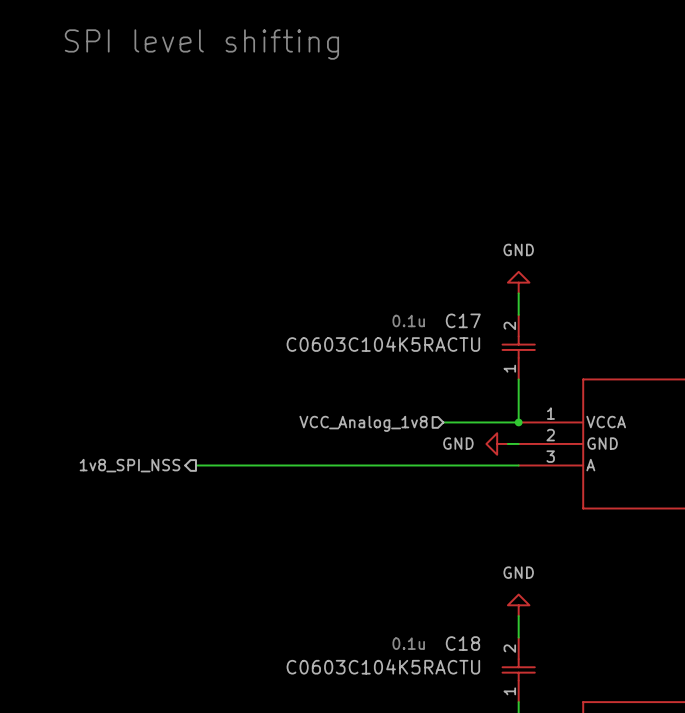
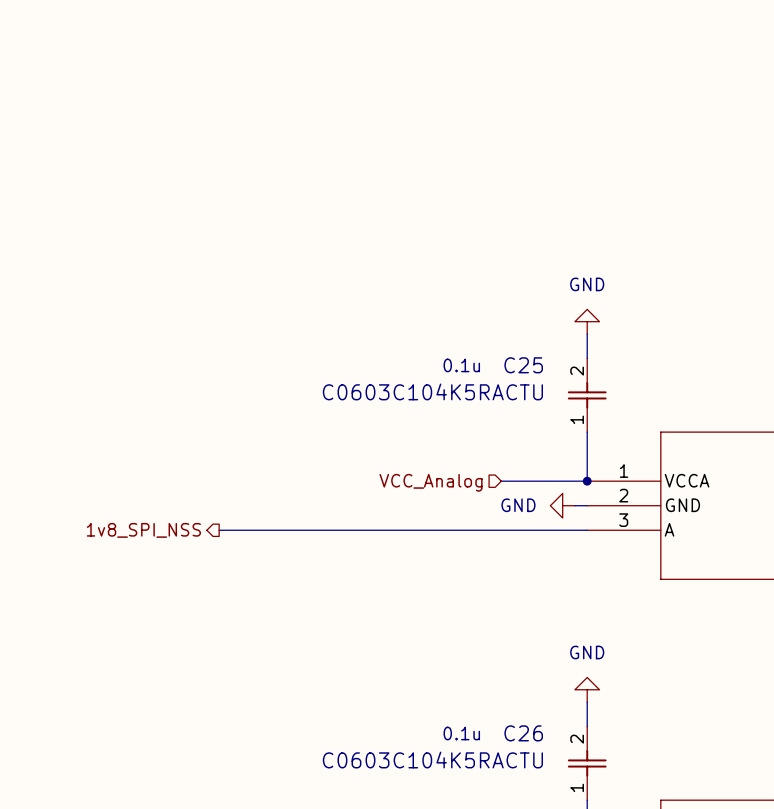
text: SPI level shifting (201, 44) -> none
C17 name: C17 (463, 320) -> C25 (523, 365)
hierarchical label: VCC_Analog_1v8 (363, 423) -> VCC_Analog (431, 482)
C18 name: C18 (462, 643) -> C26 (523, 733)

